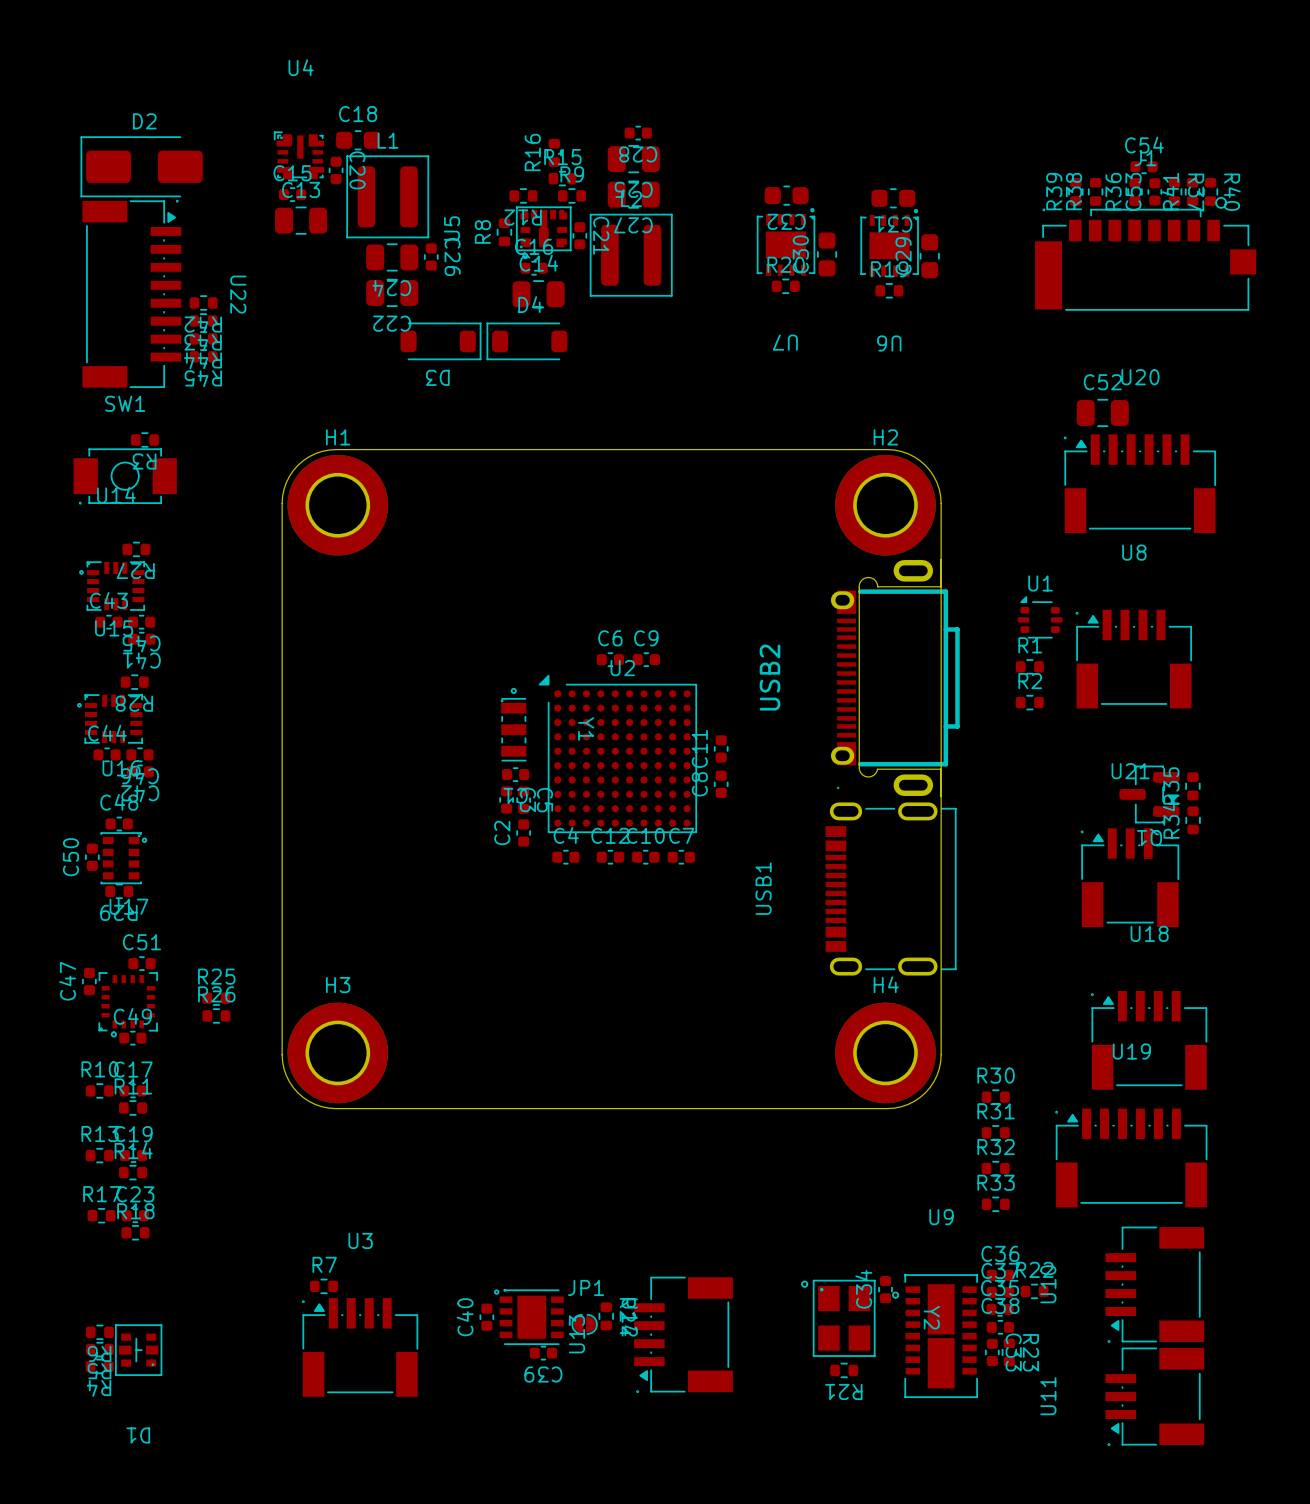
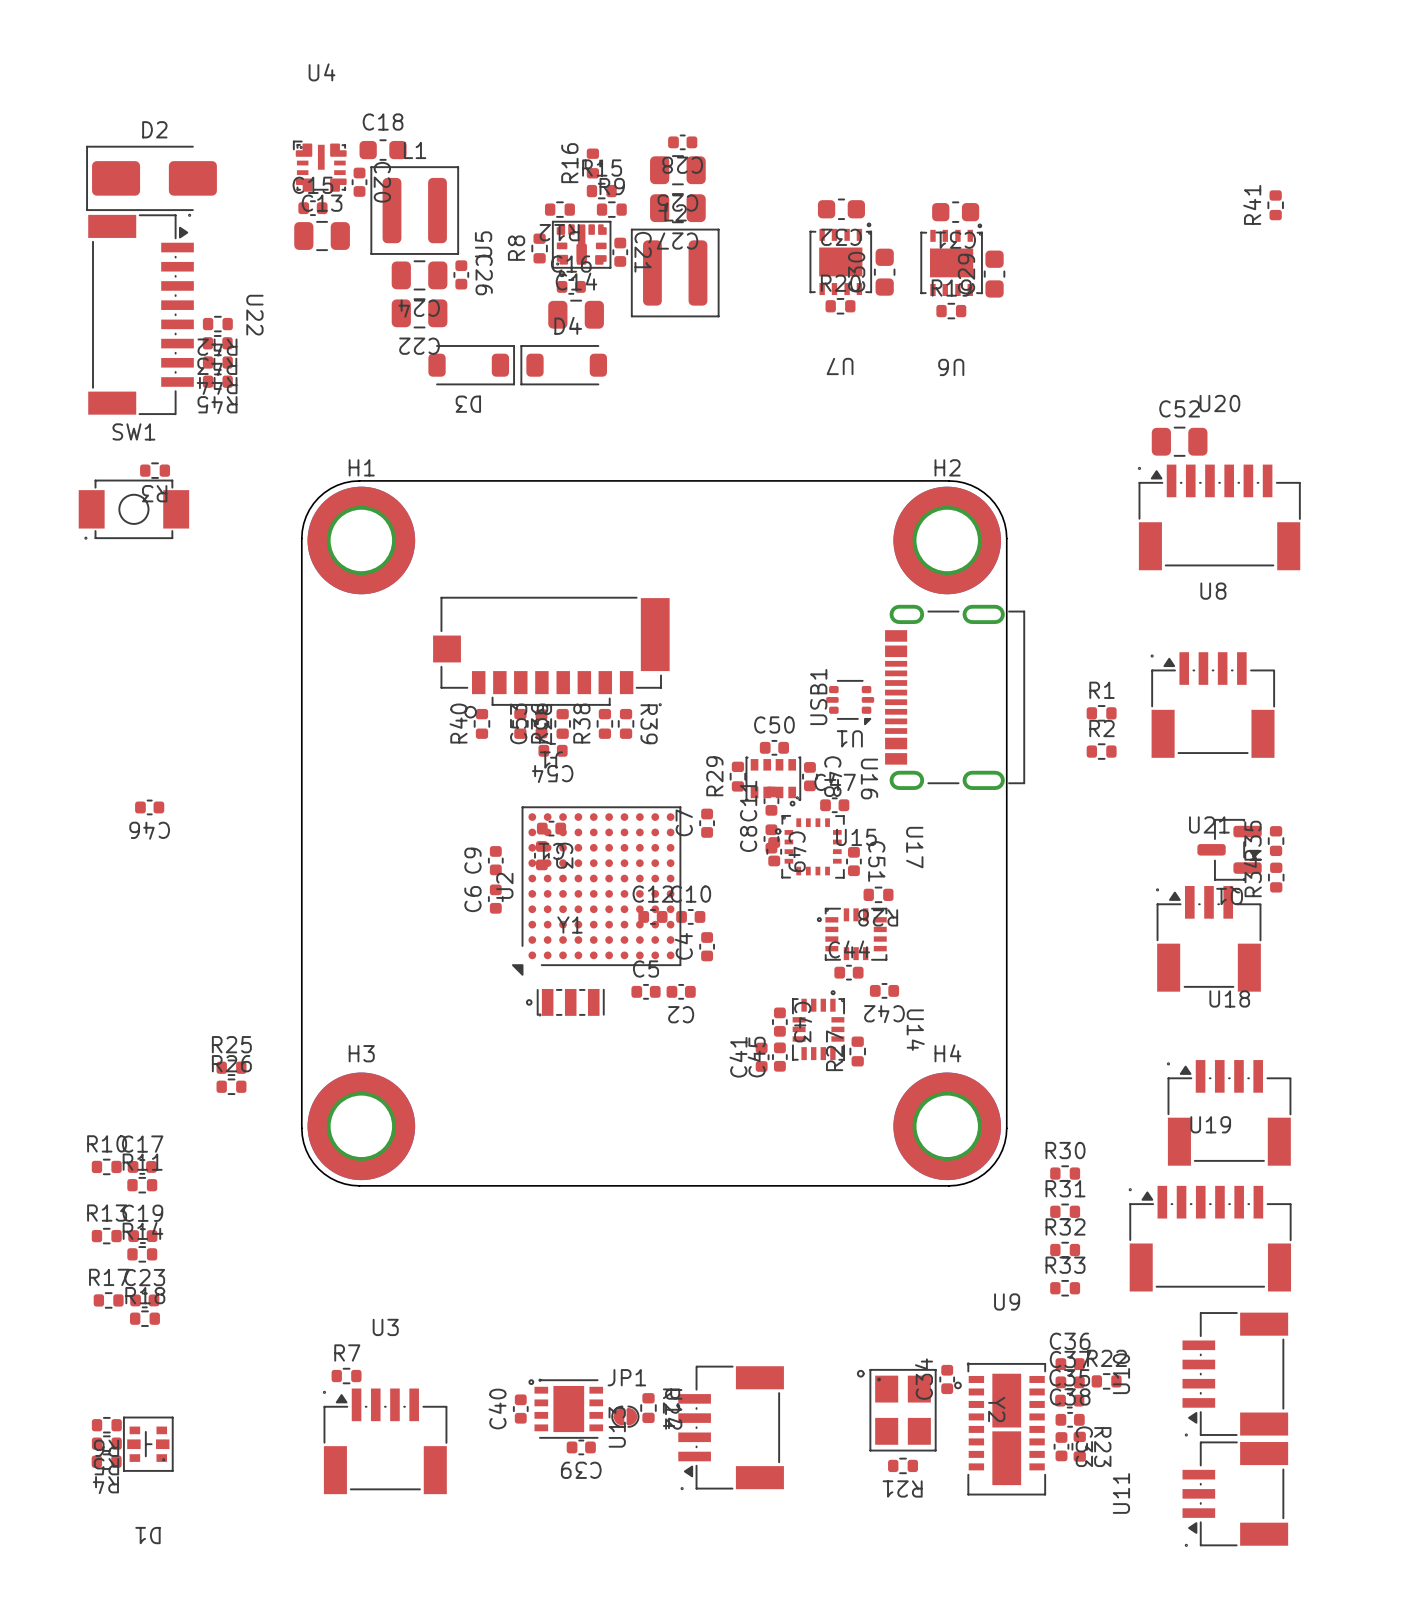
C54 name rotation: 0° (1144, 145) -> 180° (552, 774)
C54 position: (1144, 166) -> (553, 750)
R39 name rotation: 0° (1054, 191) -> 180° (649, 724)
R39 position: (1075, 191) -> (626, 723)
R38 position: (1095, 191) -> (604, 723)
R36 position: (1135, 191) -> (562, 723)
C53 position: (1154, 191) -> (541, 723)
R37 position: (1174, 191) -> (520, 723)
R40 position: (1210, 191) -> (481, 723)
R40 name rotation: 0° (1232, 192) -> 180° (458, 723)
J1 rotation: 0° (1145, 253) -> 180° (551, 657)
J1 position: (1145, 253) -> (551, 657)
R27 rotation: 0° (136, 549) -> 90° clockwise (857, 1051)
R27 position: (136, 549) -> (857, 1051)
U14 rotation: 0° (112, 586) -> 90° clockwise (818, 1025)
U14 position: (112, 586) -> (818, 1025)
U1 rotation: 0° (1040, 617) -> 180° (850, 702)
U1 position: (1040, 617) -> (850, 702)
C43 rotation: 0° (108, 622) -> 90° clockwise (779, 1022)
C43 position: (108, 622) -> (779, 1022)
C45 rotation: 0° (141, 622) -> 90° clockwise (779, 1057)
C45 position: (141, 622) -> (779, 1057)
C41 rotation: 0° (141, 639) -> 90° clockwise (761, 1057)
C41 position: (141, 639) -> (761, 1057)
C6 rotation: 0° (610, 659) -> 90° clockwise (495, 899)
C6 position: (610, 659) -> (495, 899)
C9 rotation: 0° (646, 659) -> 90° clockwise (495, 860)
C9 position: (646, 659) -> (495, 860)
USB2: (895, 678) -> none
R28 position: (134, 682) -> (878, 894)
U15 position: (110, 718) -> (852, 934)
Y1 rotation: 0° (513, 724) -> 90° counterclockwise (565, 1002)
Y1 position: (513, 724) -> (565, 1002)
U2 rotation: 0° (617, 753) -> 90° counterclockwise (596, 891)
U2 position: (617, 753) -> (596, 891)
C44 position: (107, 754) -> (848, 972)
C42 position: (140, 771) -> (884, 990)
C5 rotation: 0° (523, 800) -> 90° clockwise (646, 991)
C5 position: (523, 800) -> (646, 991)
C48 rotation: 0° (119, 823) -> 90° clockwise (809, 776)
C48 position: (119, 823) -> (809, 776)
C2 rotation: 0° (523, 832) -> 90° clockwise (681, 991)
C2 position: (523, 832) -> (681, 991)
C50 rotation: 0° (92, 857) -> 90° clockwise (774, 747)
C50 position: (92, 857) -> (774, 747)
C4 rotation: 0° (565, 857) -> 90° clockwise (707, 946)
C4 position: (565, 857) -> (707, 946)
C7 rotation: 0° (681, 857) -> 90° clockwise (707, 823)
C7 position: (681, 857) -> (707, 823)
U16 rotation: 0° (123, 858) -> 90° clockwise (773, 781)
U16 position: (123, 858) -> (773, 781)
USB1 position: (891, 888) -> (955, 697)
R29 rotation: 0° (119, 891) -> 90° clockwise (737, 776)
R29 position: (119, 891) -> (737, 776)
C51 rotation: 0° (141, 963) -> 90° clockwise (853, 861)
C51 position: (141, 963) -> (853, 861)
C47 rotation: 0° (89, 981) -> 90° clockwise (834, 805)
C47 position: (89, 981) -> (834, 805)
U17 rotation: 0° (128, 1004) -> 90° clockwise (809, 846)
U17 position: (128, 1004) -> (809, 846)
C49 rotation: 0° (132, 1038) -> 90° clockwise (774, 851)
C49 position: (132, 1038) -> (774, 851)

